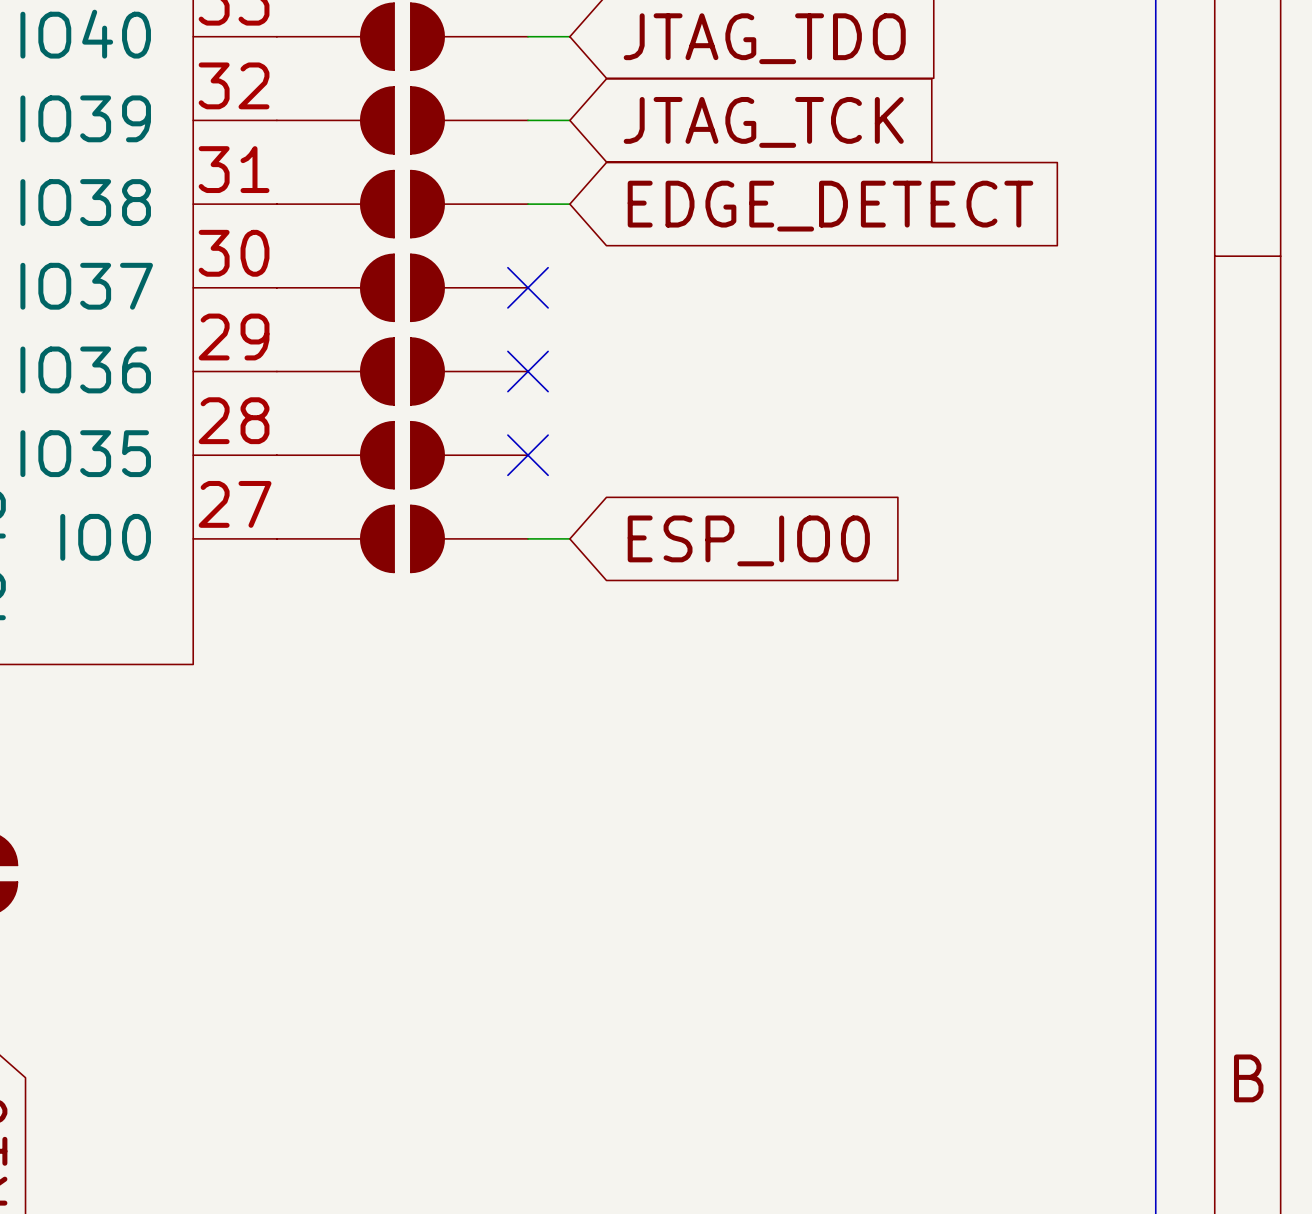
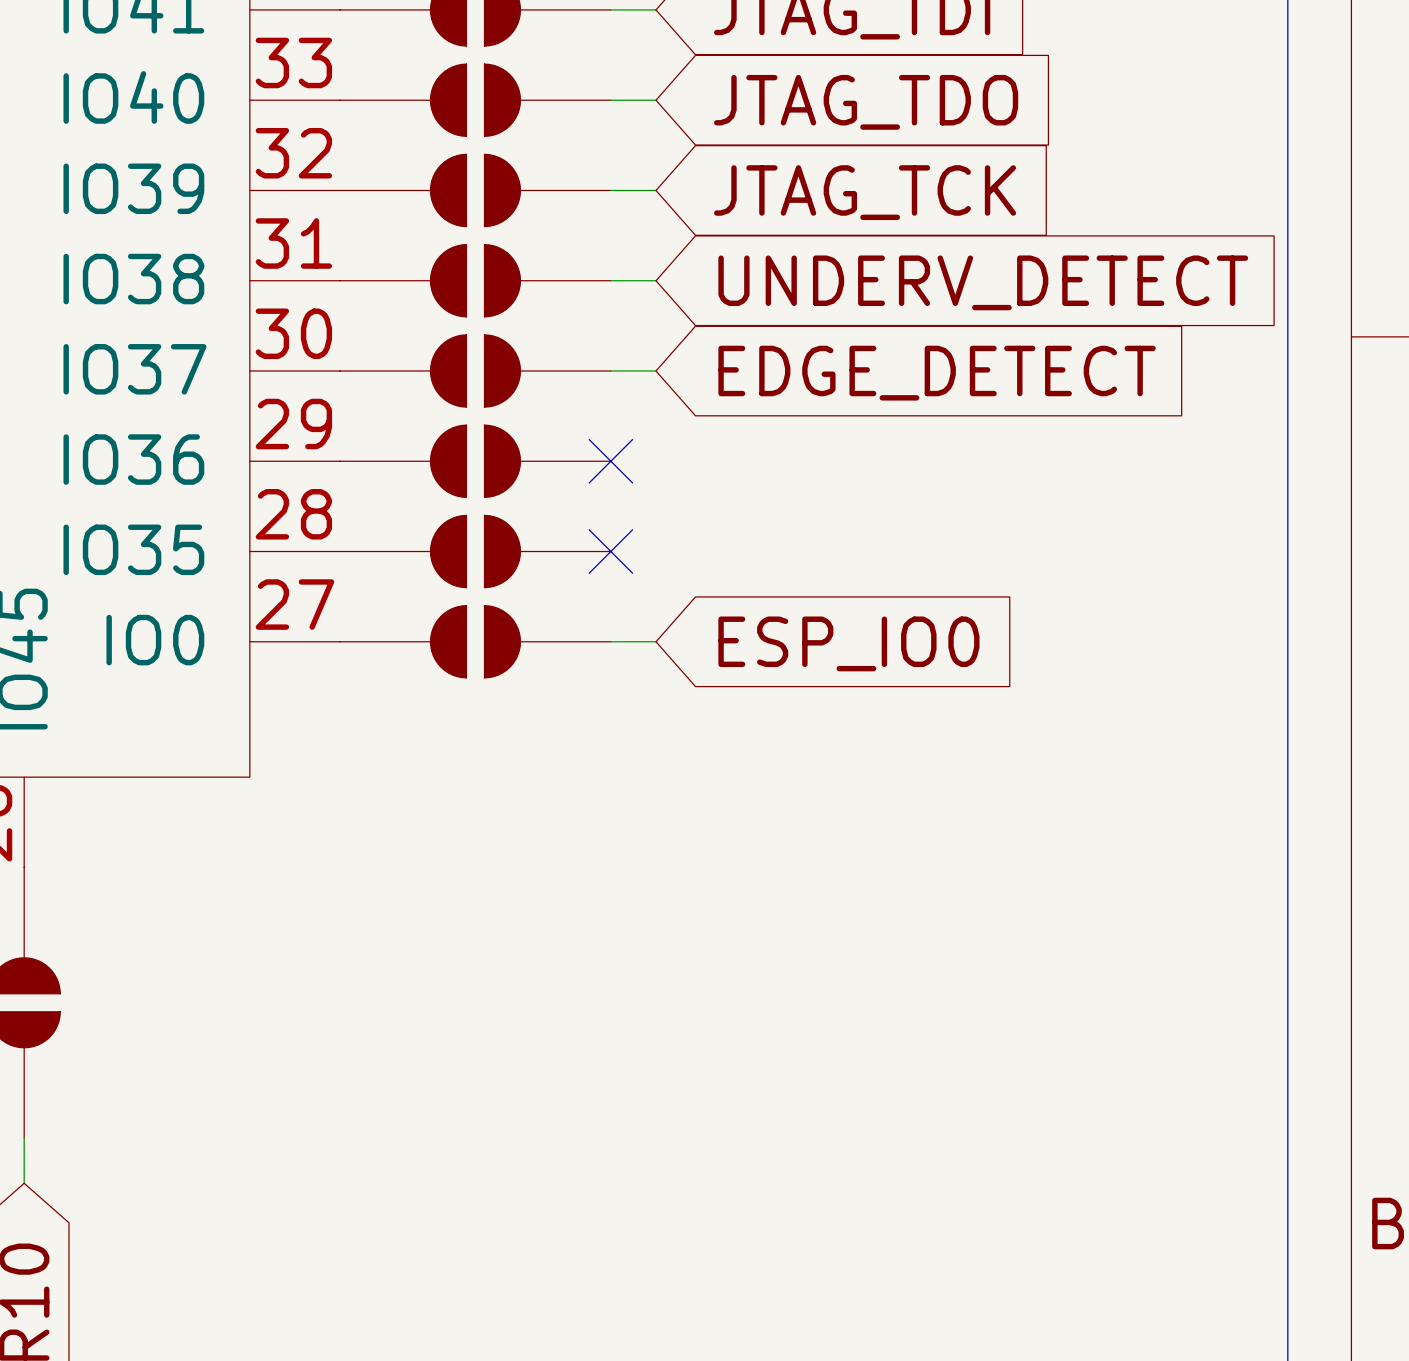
global label: EDGE_DETECT (830, 206) -> UNDERV_DETECT (983, 282)
wire: none -> (610, 370) (656, 370)
no-connect mark: (528, 287) -> none
global label: none -> EDGE_DETECT (937, 373)

